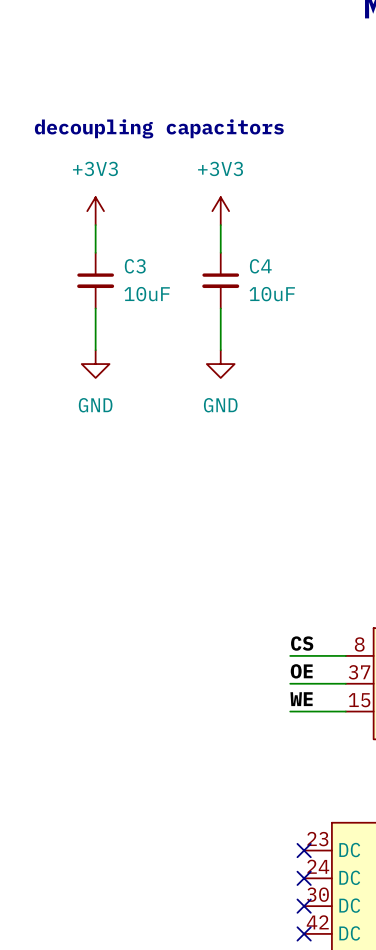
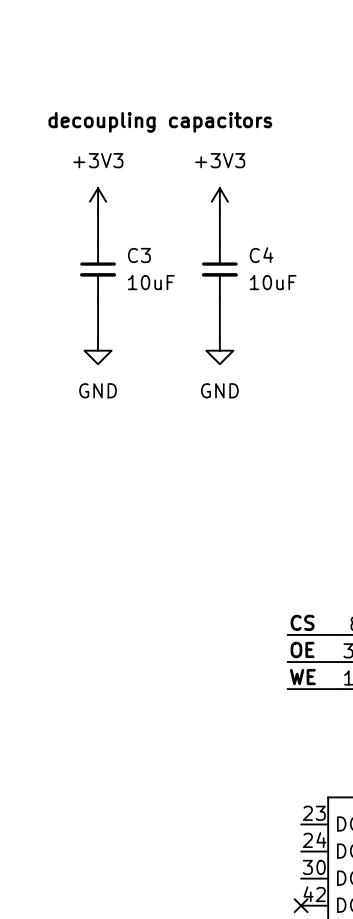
no-connect mark: (304, 850) -> none
no-connect mark: (304, 878) -> none
no-connect mark: (304, 906) -> none

